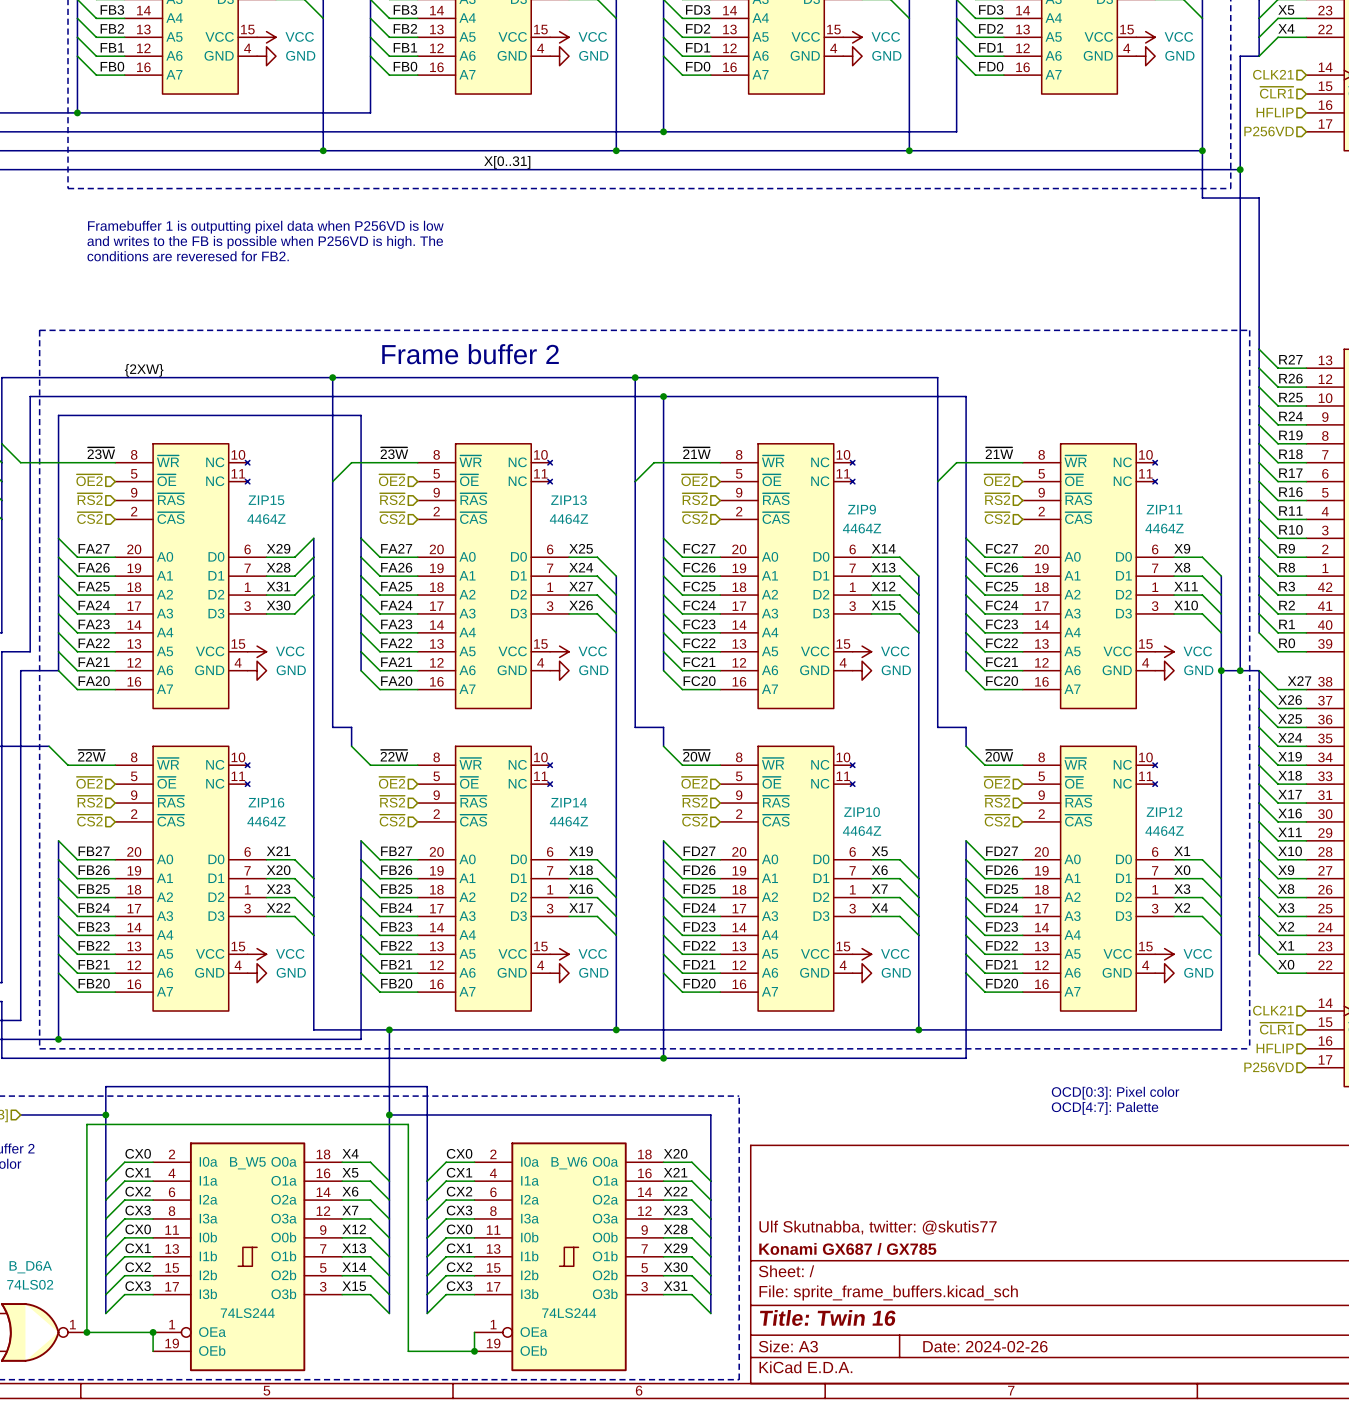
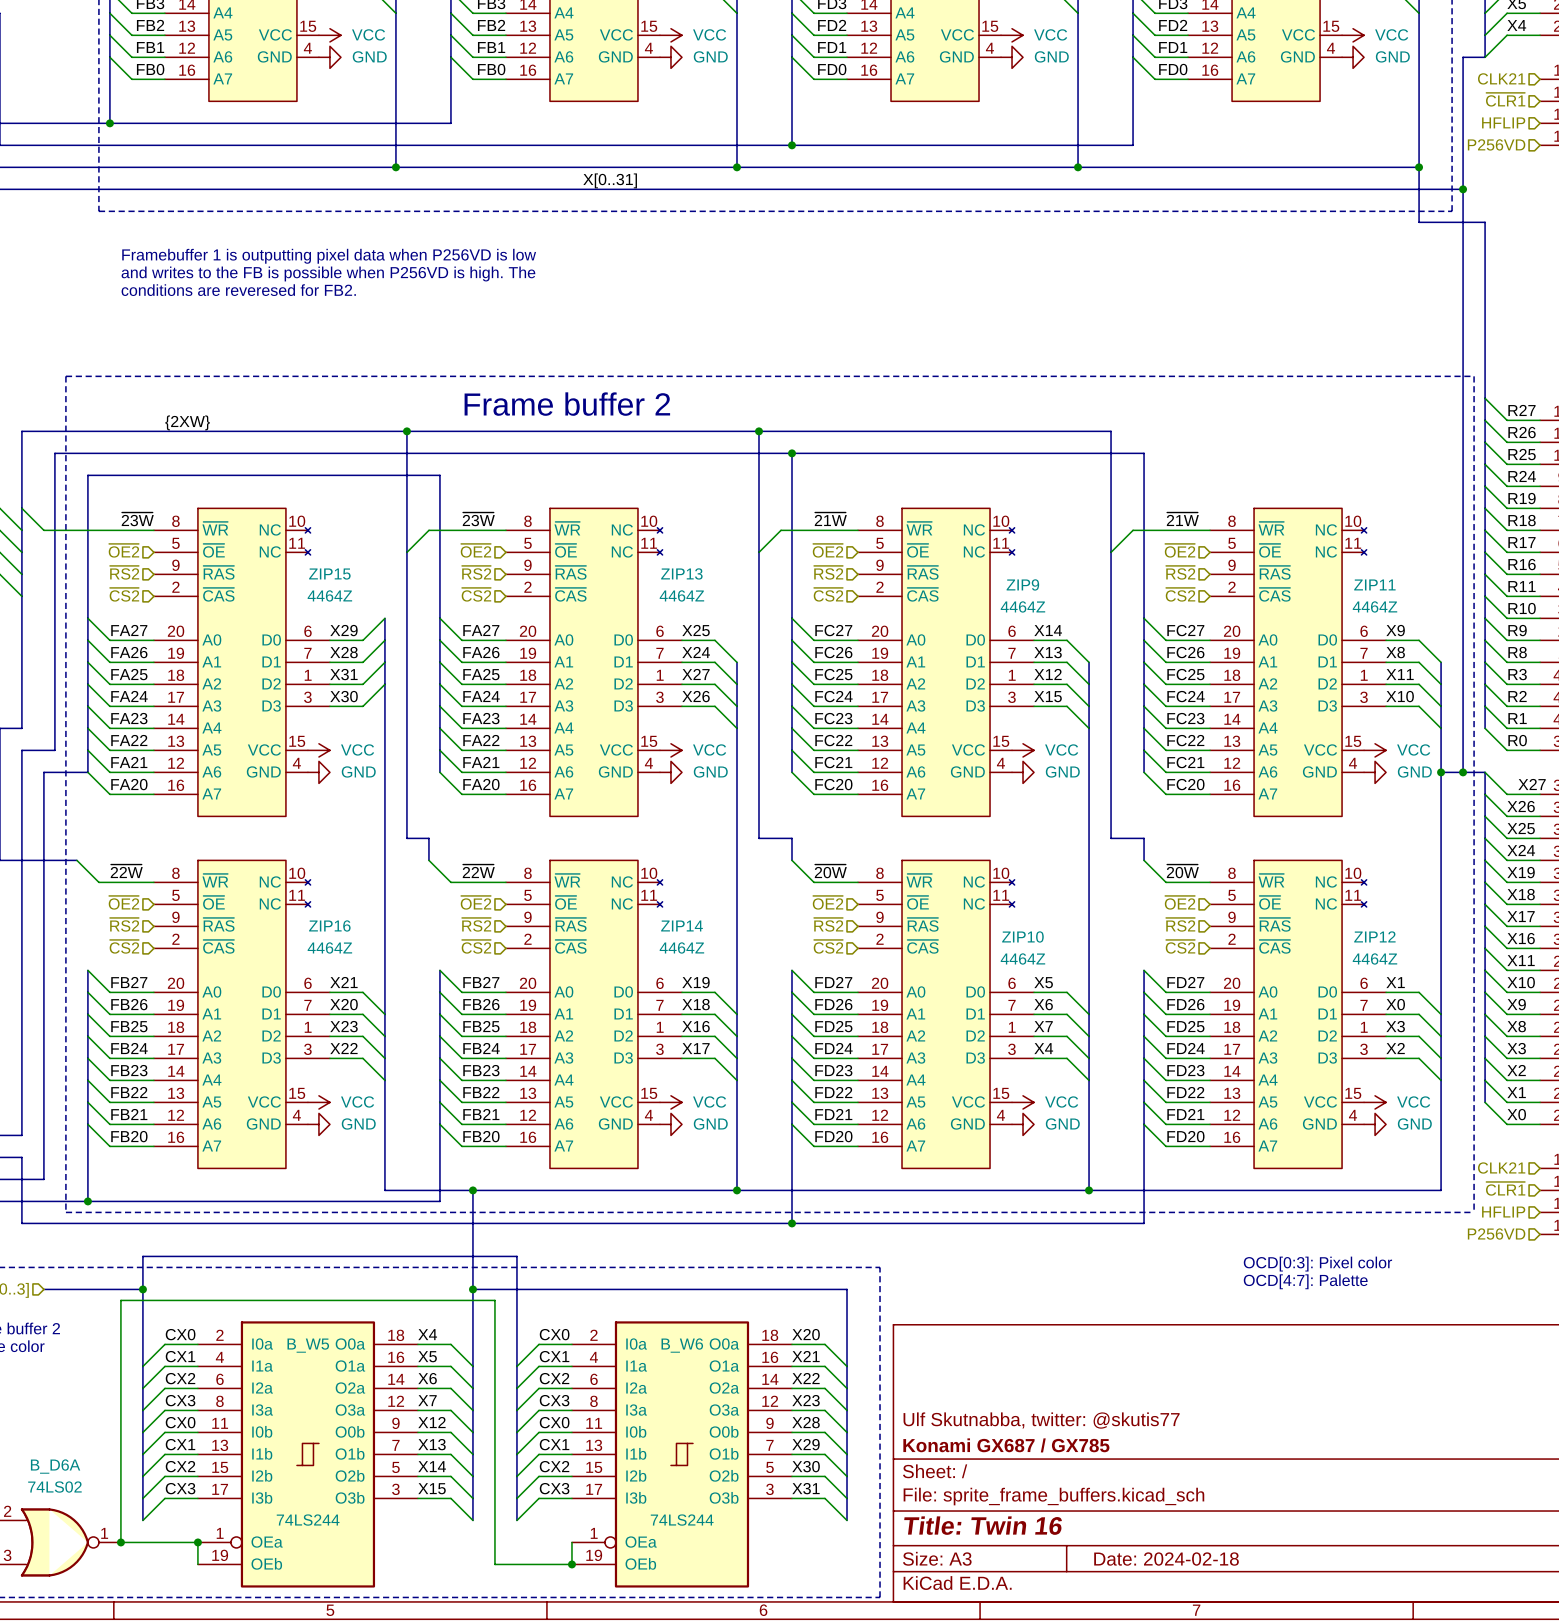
title block: Date: 2024-02-26 (985, 1346) -> Date: 2024-02-18 (1166, 1559)

